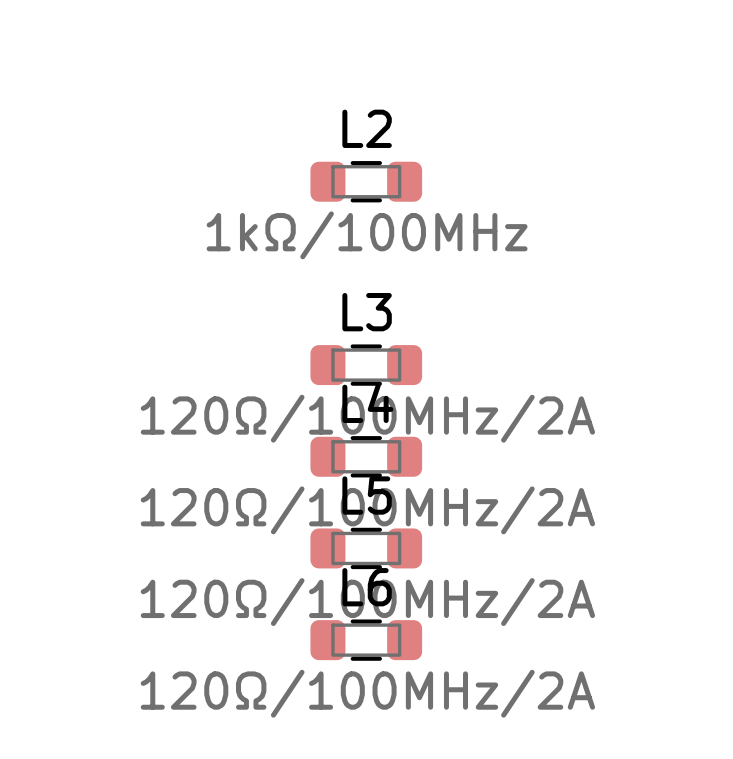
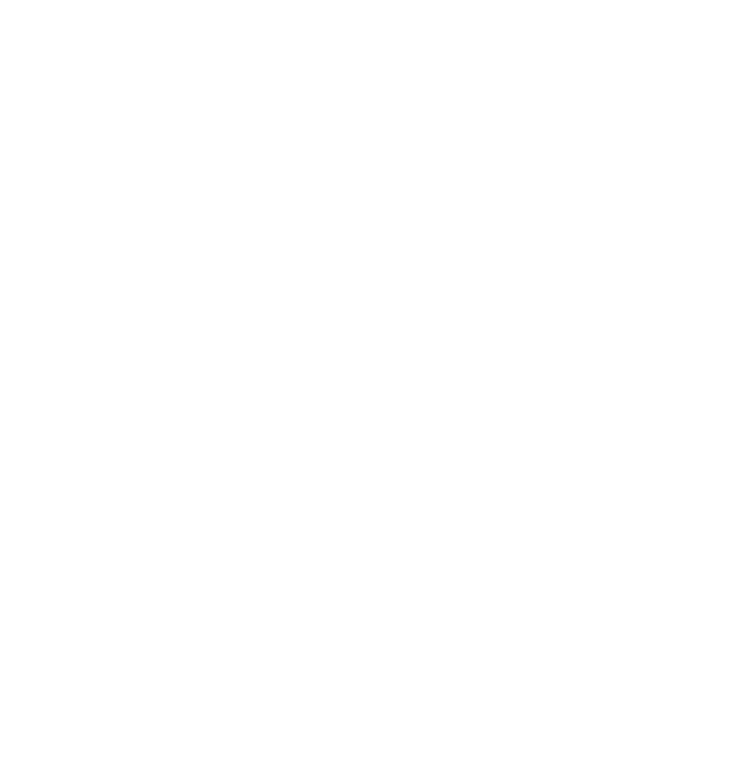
L2: 1kΩ/100MHz (366, 181) -> none
L3: 120Ω/100MHz/2A (366, 365) -> none
L4: 120Ω/100MHz/2A (366, 456) -> none
L5: 120Ω/100MHz/2A (366, 548) -> none
L6: 120Ω/100MHz/2A (366, 640) -> none

